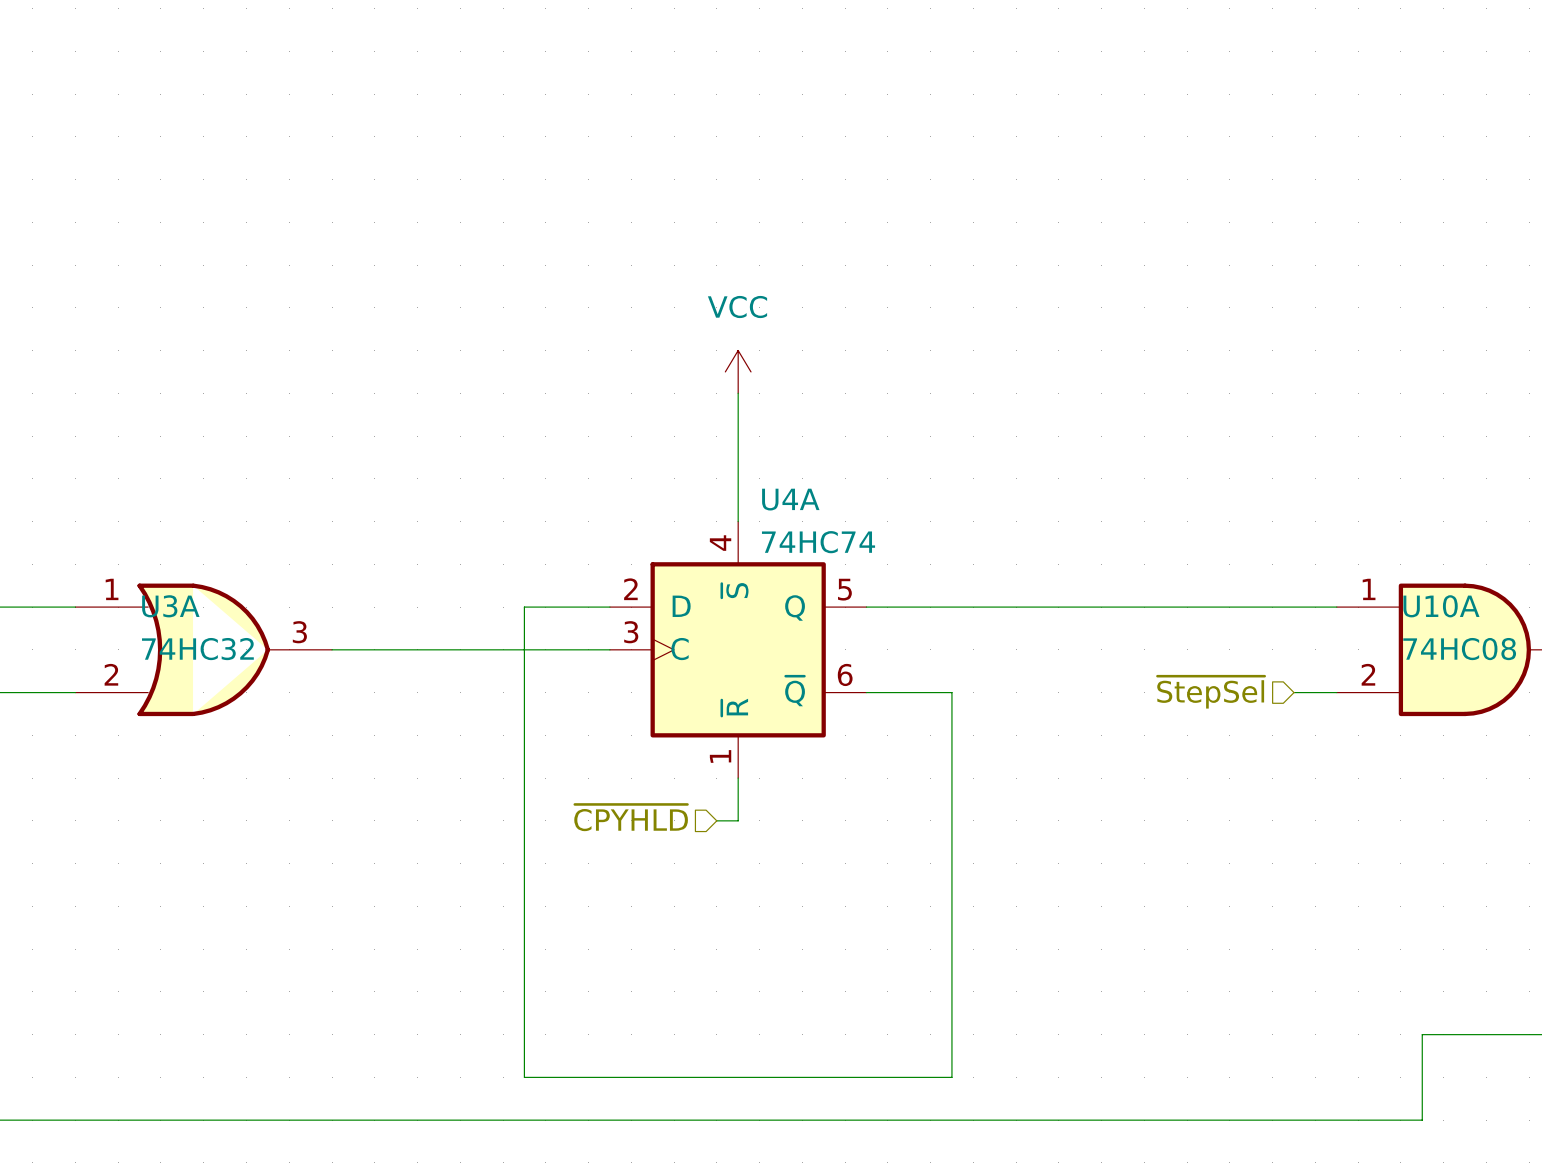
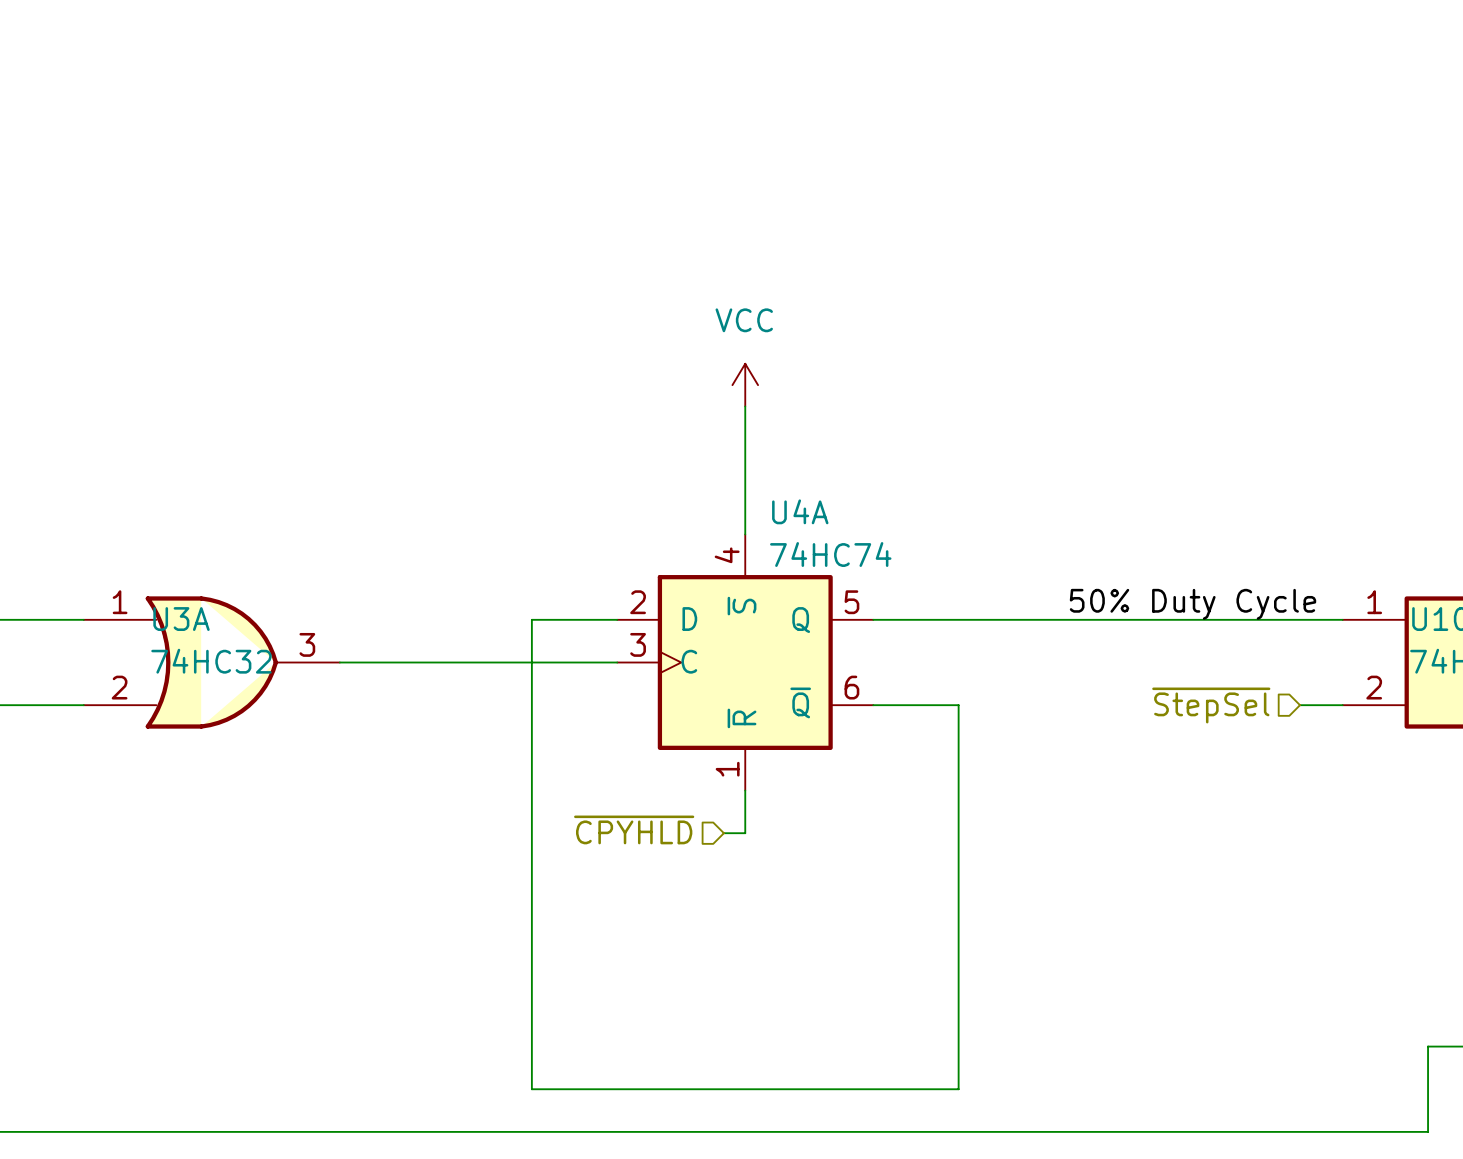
label: none -> 50% Duty Cycle (1192, 604)

